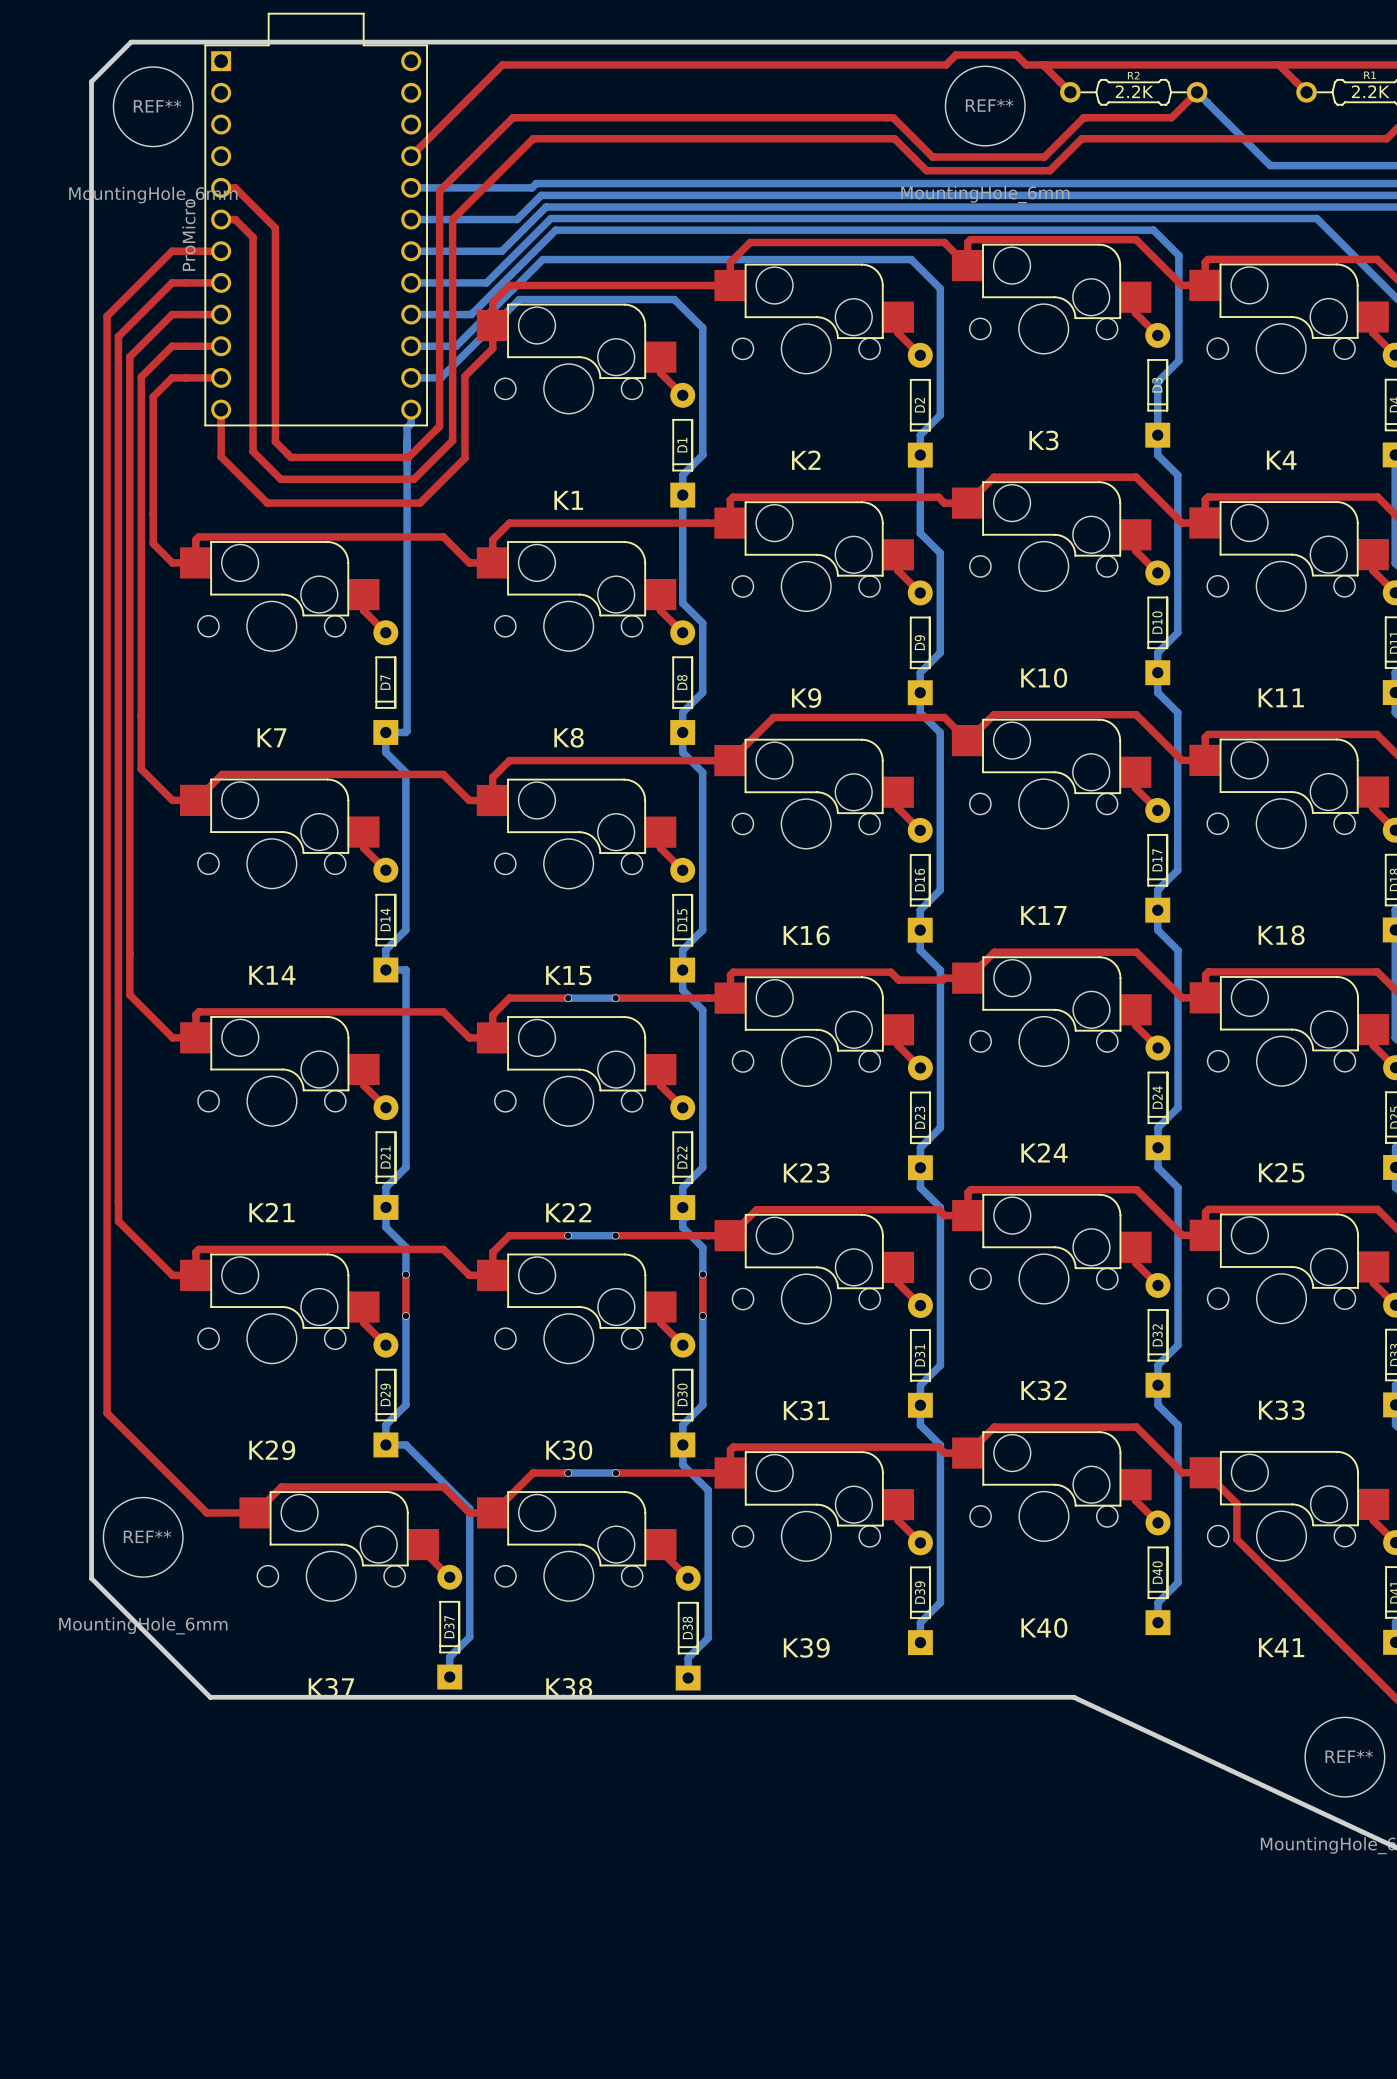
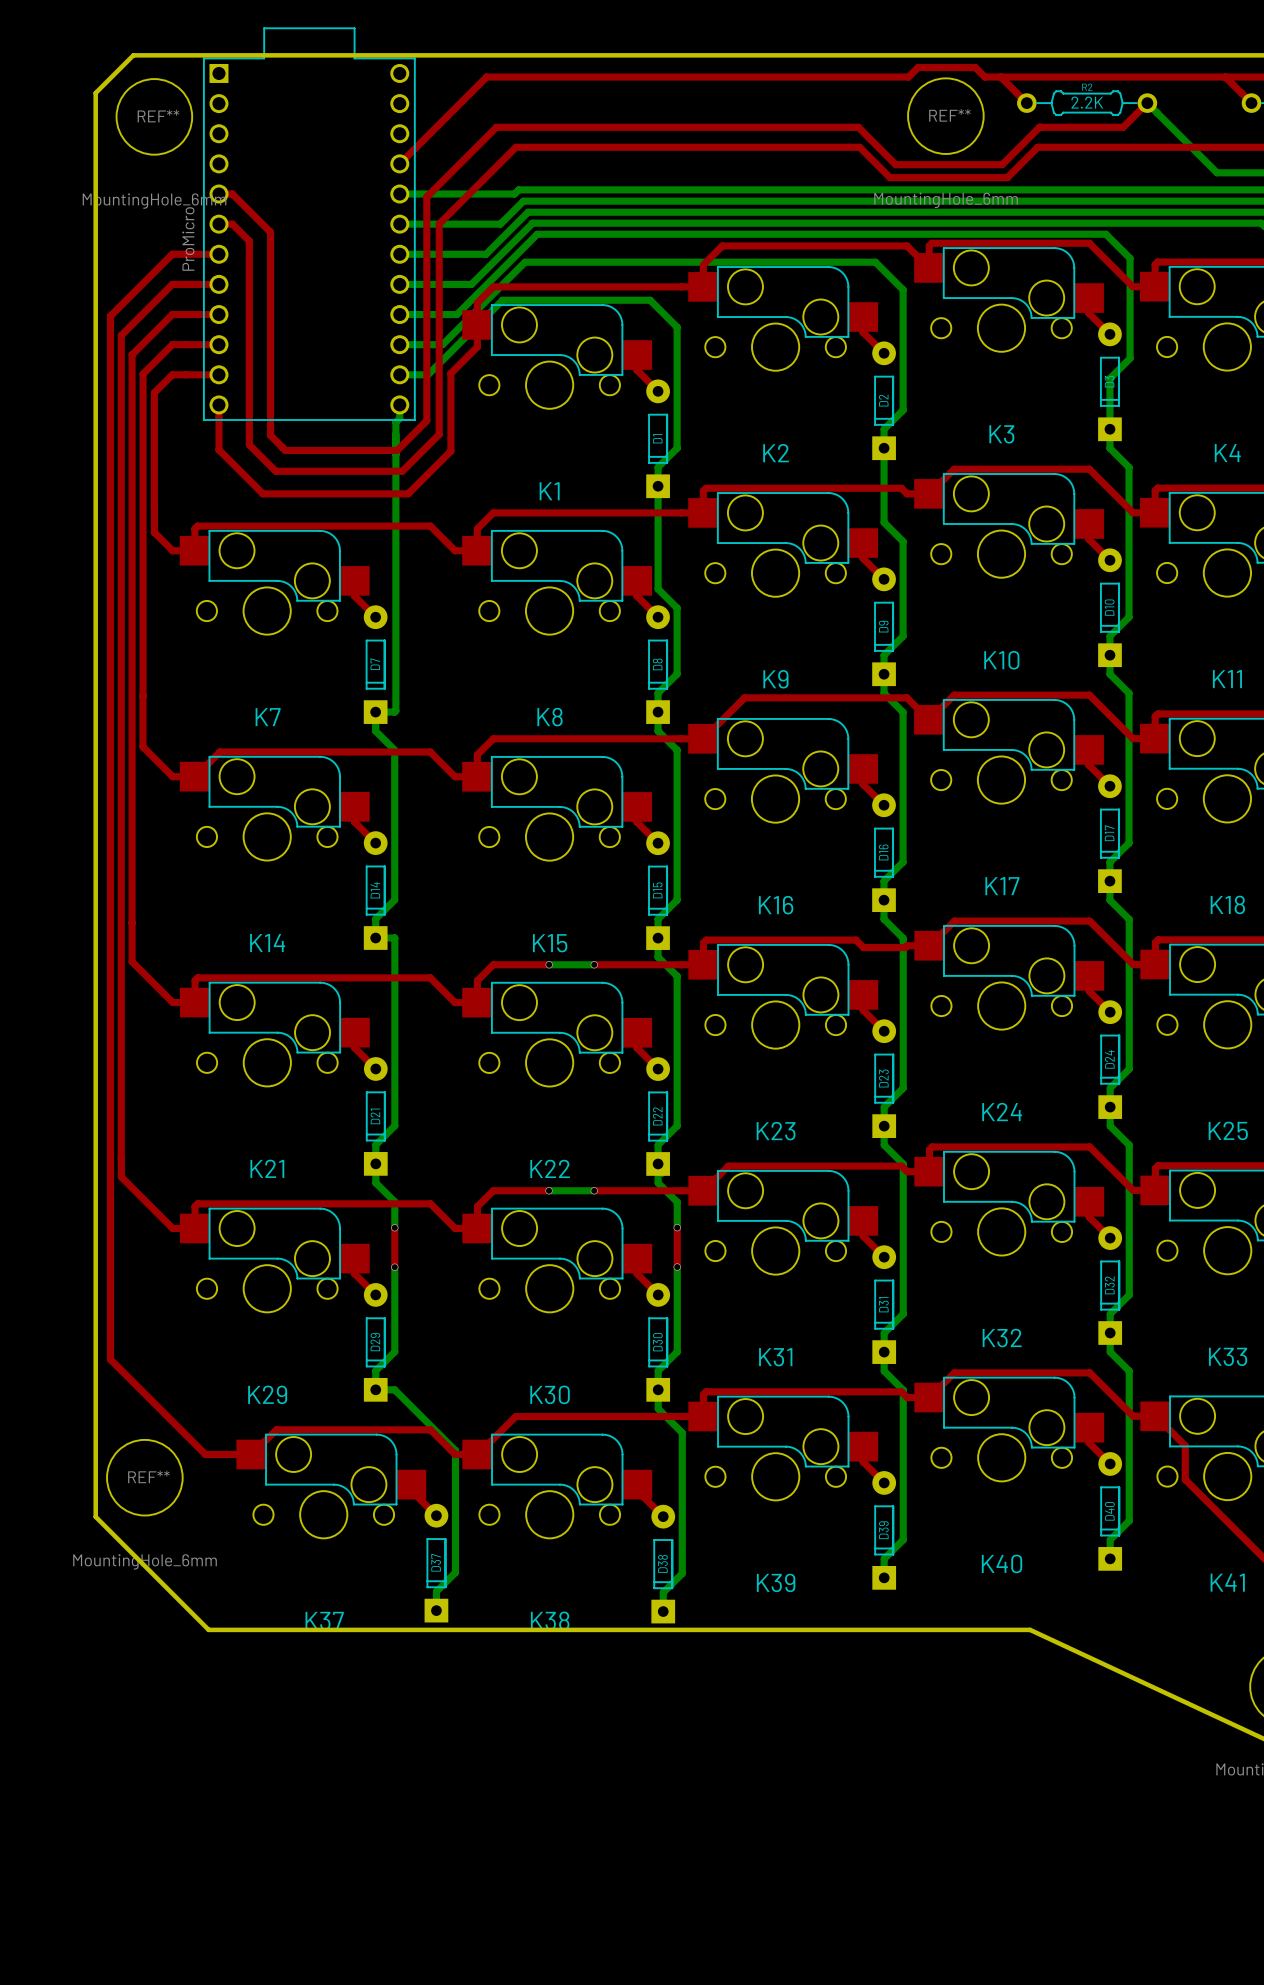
top track: none -> (549, 1416) (594, 1416)
bottom track: (568, 1473) (615, 1473) -> none
via: (568, 1473) -> none
via: (615, 1473) -> none

